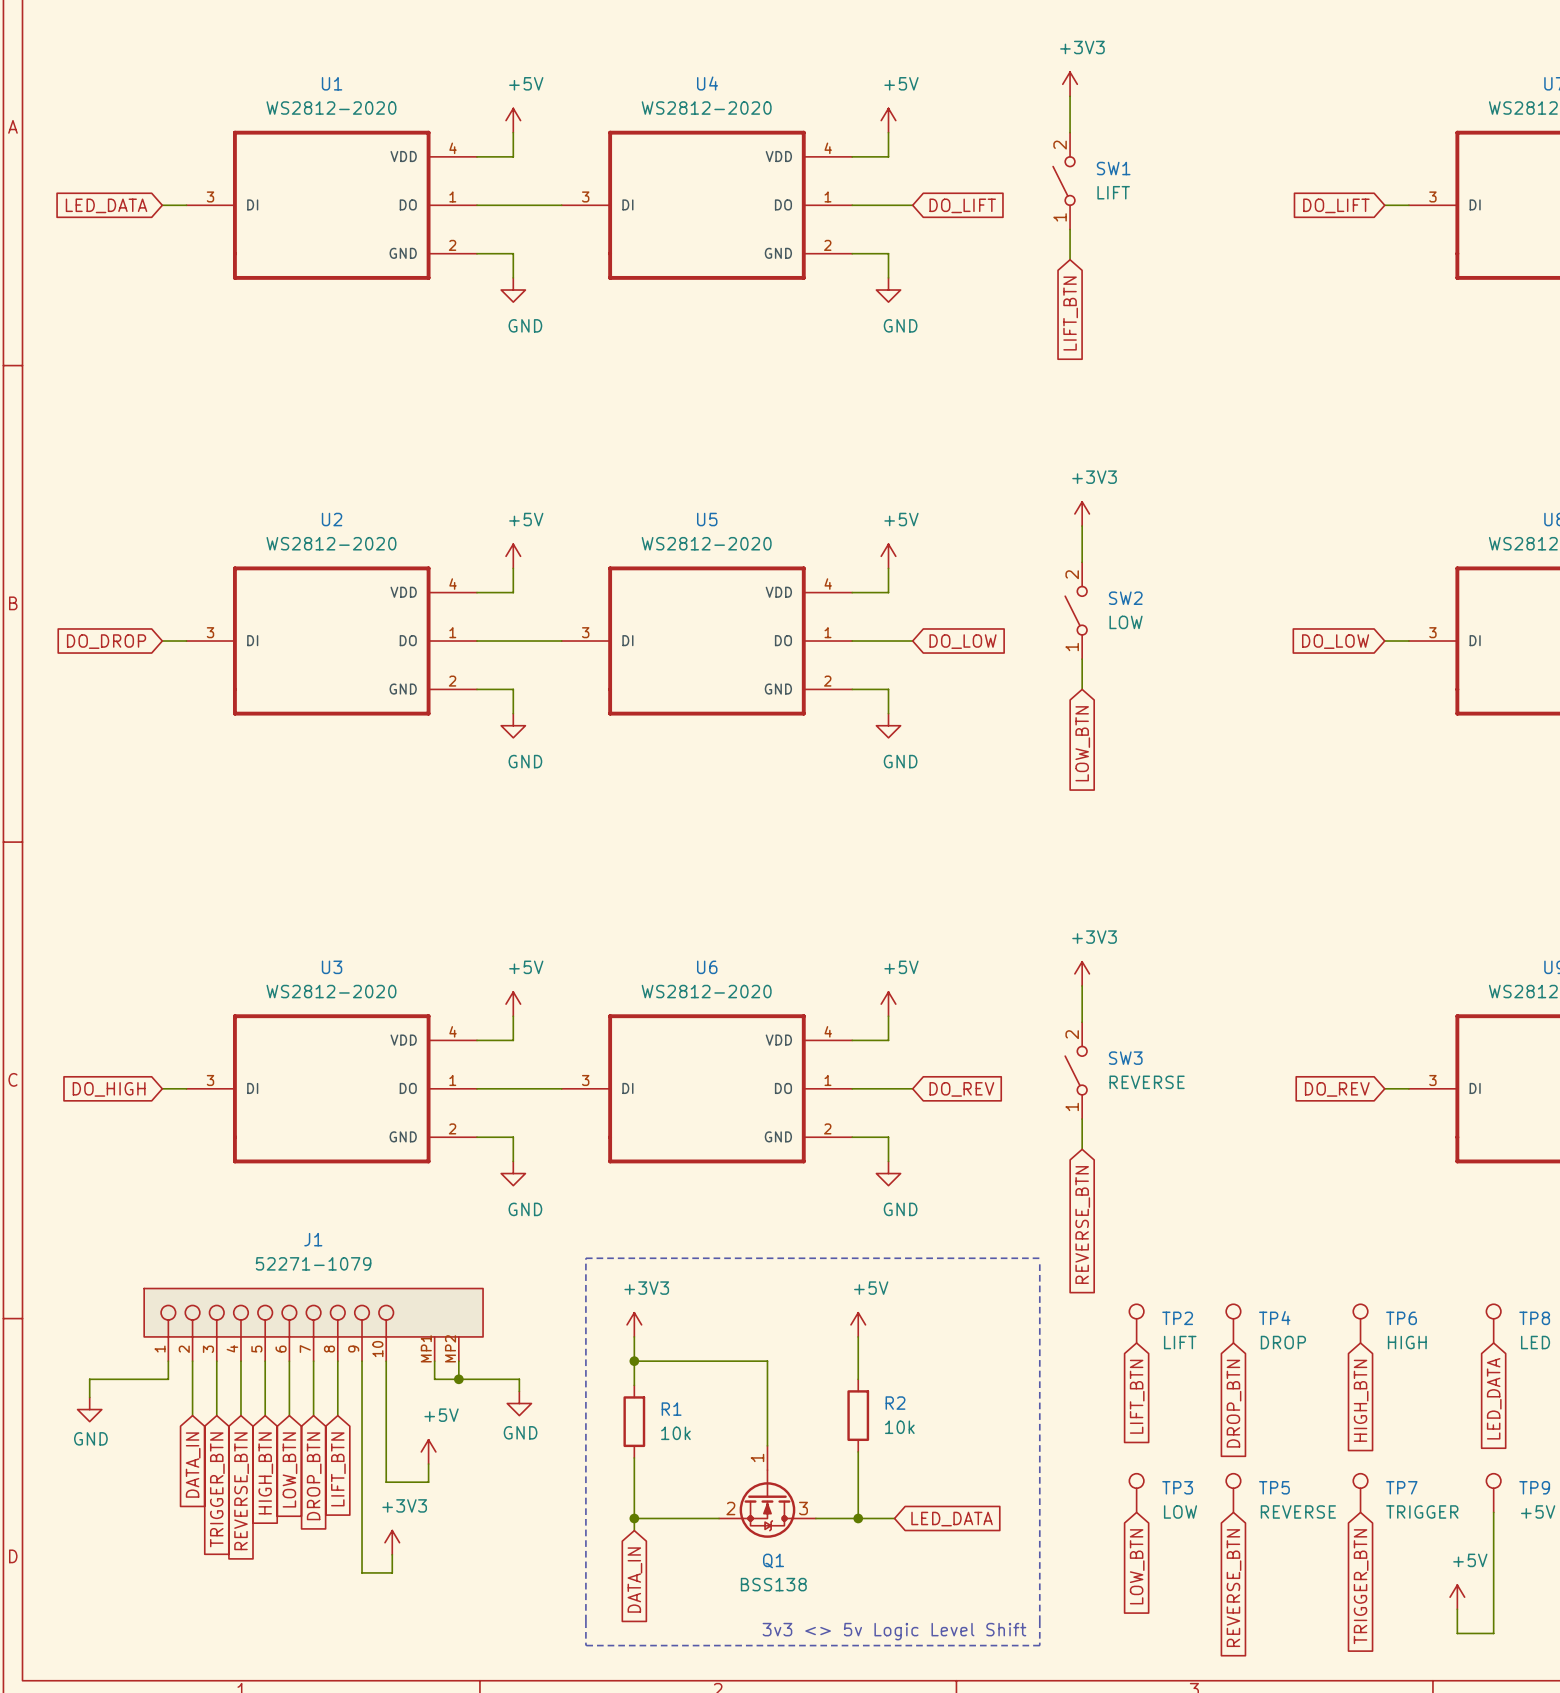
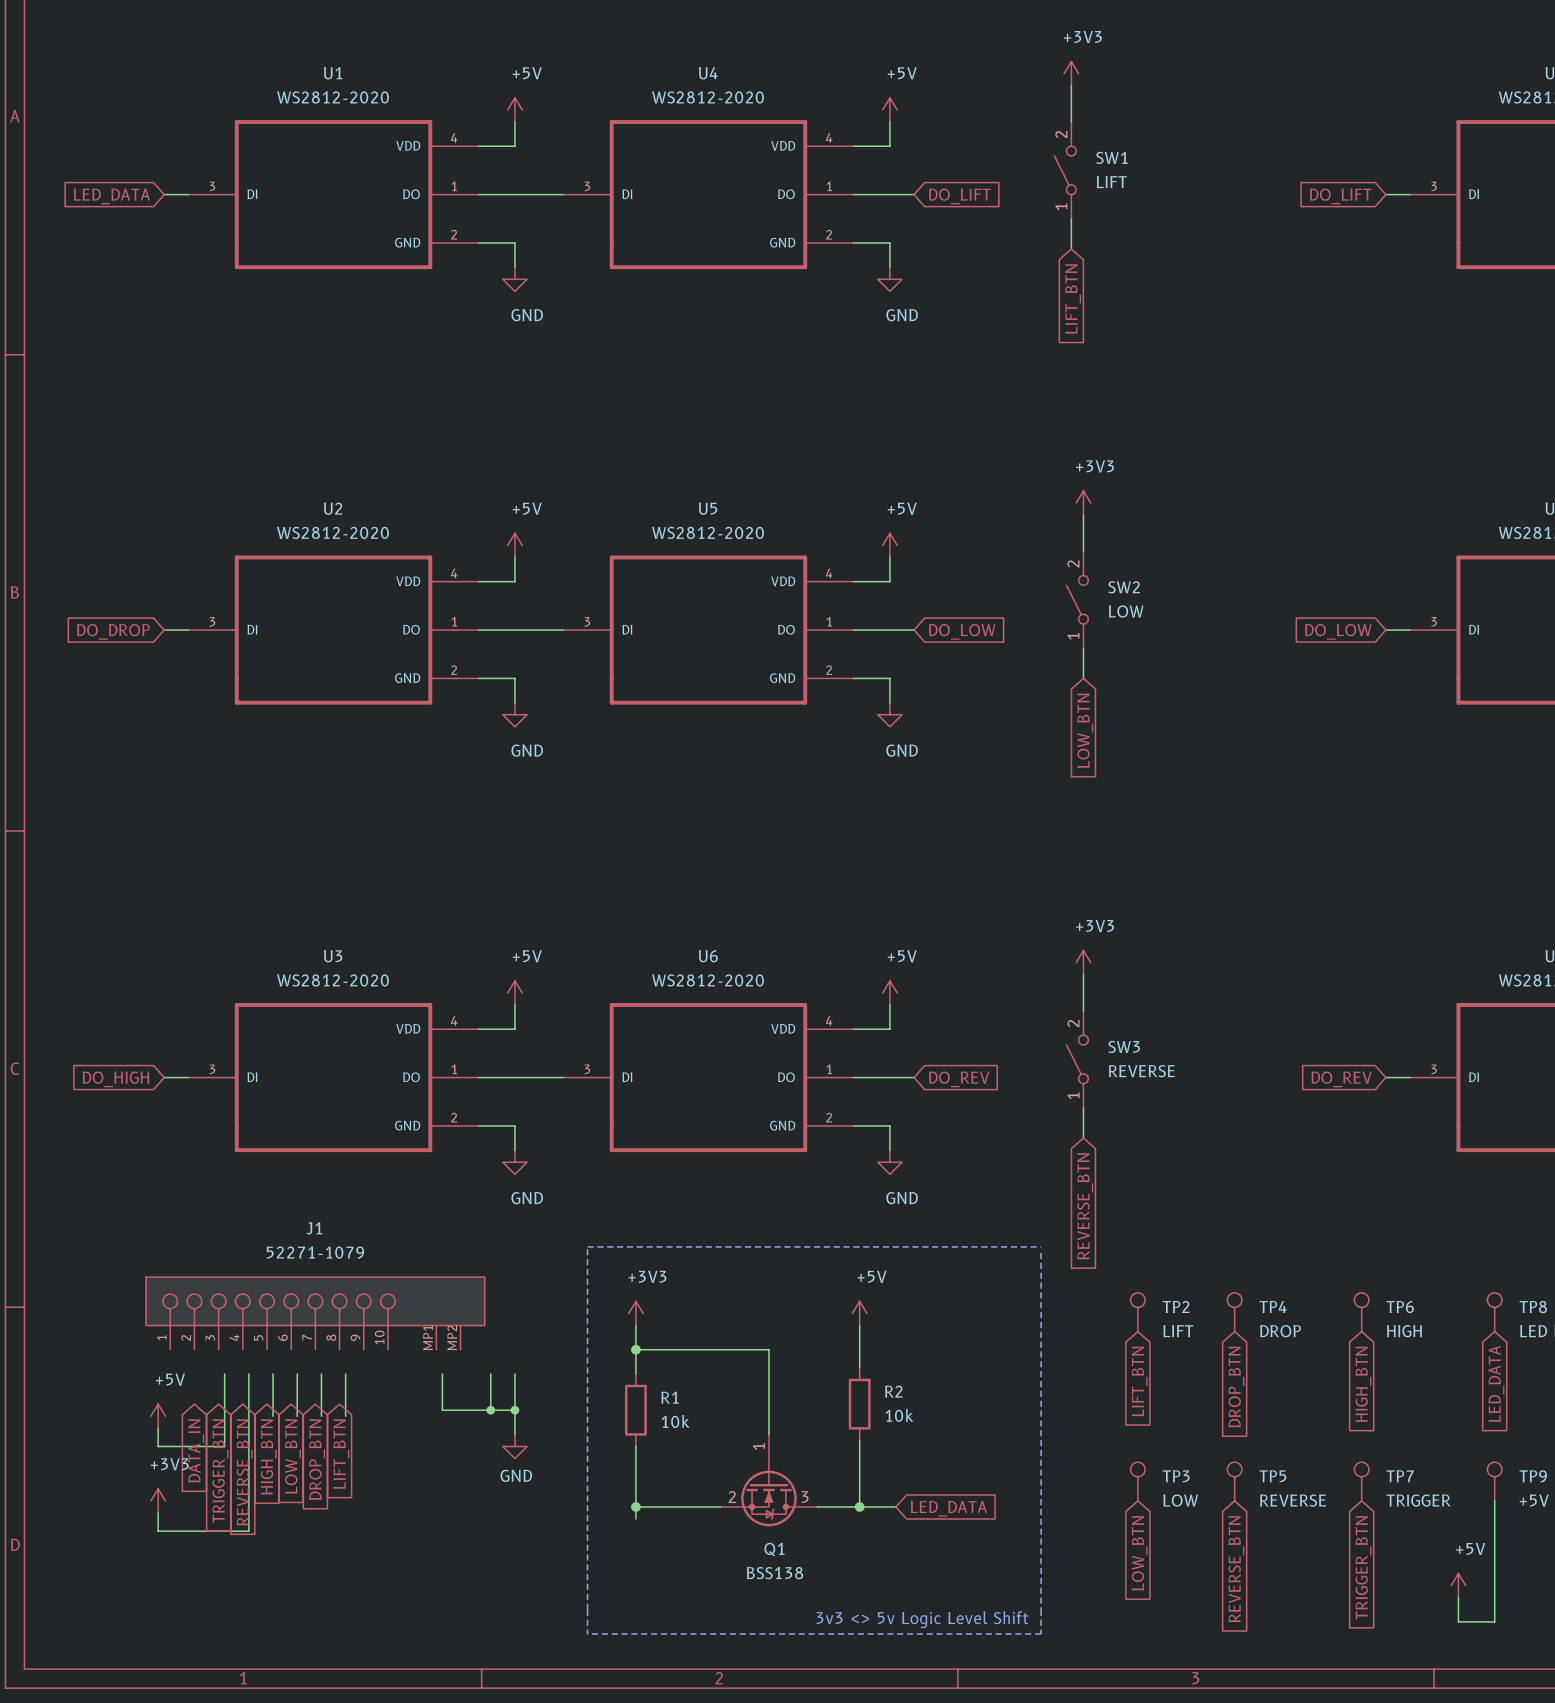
wire: (168, 1361) (168, 1379) (89, 1379) (89, 1397) -> none
wire: (192, 1361) (192, 1415) -> none
wire: (216, 1361) (216, 1415) -> none
wire: (240, 1361) (240, 1415) -> none
wire: (265, 1361) (265, 1415) -> none
wire: (289, 1361) (289, 1415) -> none
wire: (313, 1361) (313, 1415) -> none
wire: (337, 1361) (337, 1415) -> none
wire: (362, 1361) (362, 1572) (392, 1572) (392, 1554) -> none
wire: (386, 1361) (386, 1482) (428, 1482) (428, 1464) -> none
wire: (434, 1361) (434, 1379) (519, 1379) (519, 1391) -> none
wire: (458, 1361) (458, 1379) -> none
junction: (458, 1379) -> none
wire: none -> (224, 1373) (224, 1446) (158, 1446) (158, 1428)
wire: none -> (248, 1373) (248, 1531) (158, 1531) (158, 1513)
wire: none -> (273, 1373) (273, 1416)
wire: none -> (297, 1373) (297, 1416)
wire: none -> (321, 1373) (321, 1416)
wire: none -> (345, 1373) (345, 1416)
wire: none -> (442, 1373) (442, 1410) (514, 1410)
wire: none -> (490, 1373) (490, 1410)
wire: none -> (514, 1373) (514, 1434)
power symbol position: GND (519, 1403) -> GND (514, 1446)
power symbol: GND (89, 1409) -> none
junction: none -> (490, 1410)
junction: none -> (514, 1410)
power symbol: none -> +5V (158, 1416)
power symbol: +5V (428, 1451) -> none
power symbol position: +3V3 (392, 1542) -> +3V3 (158, 1500)
global label: DATA_IN (634, 1580) -> none

